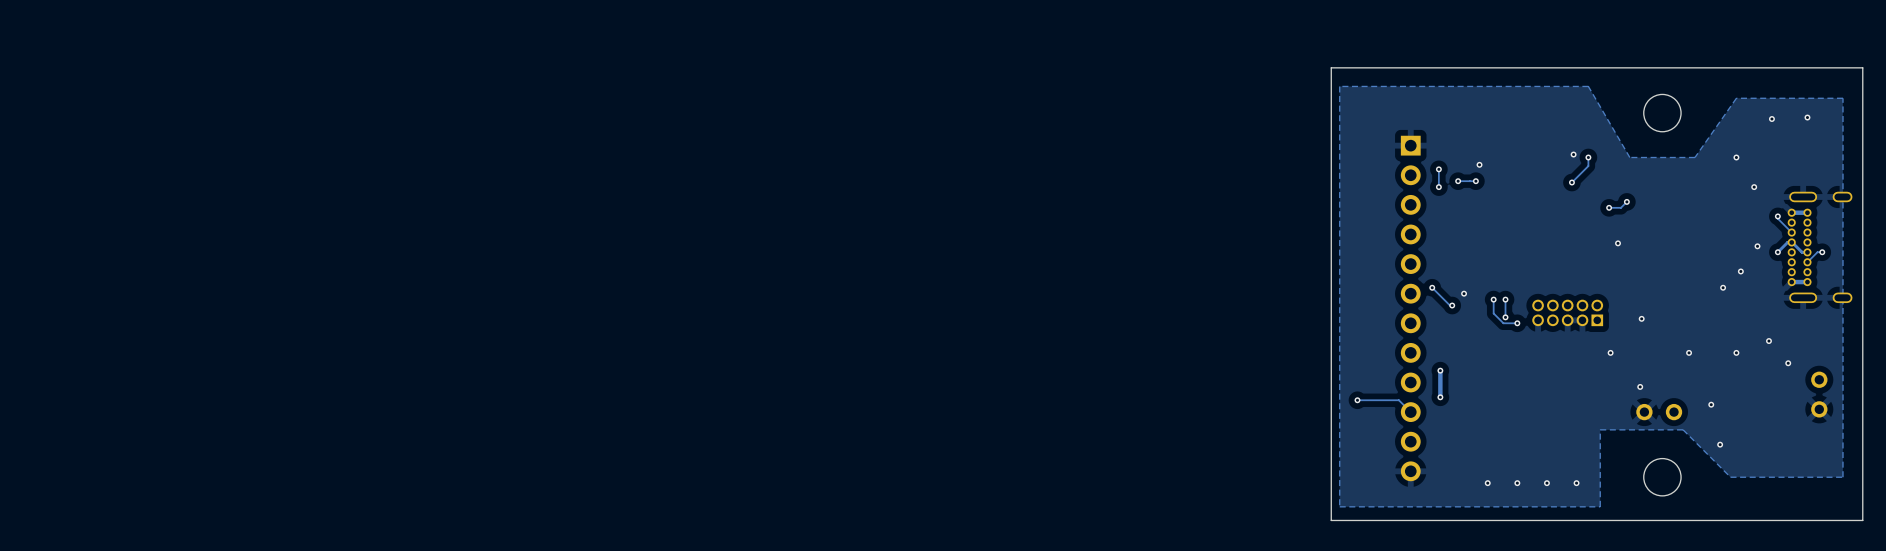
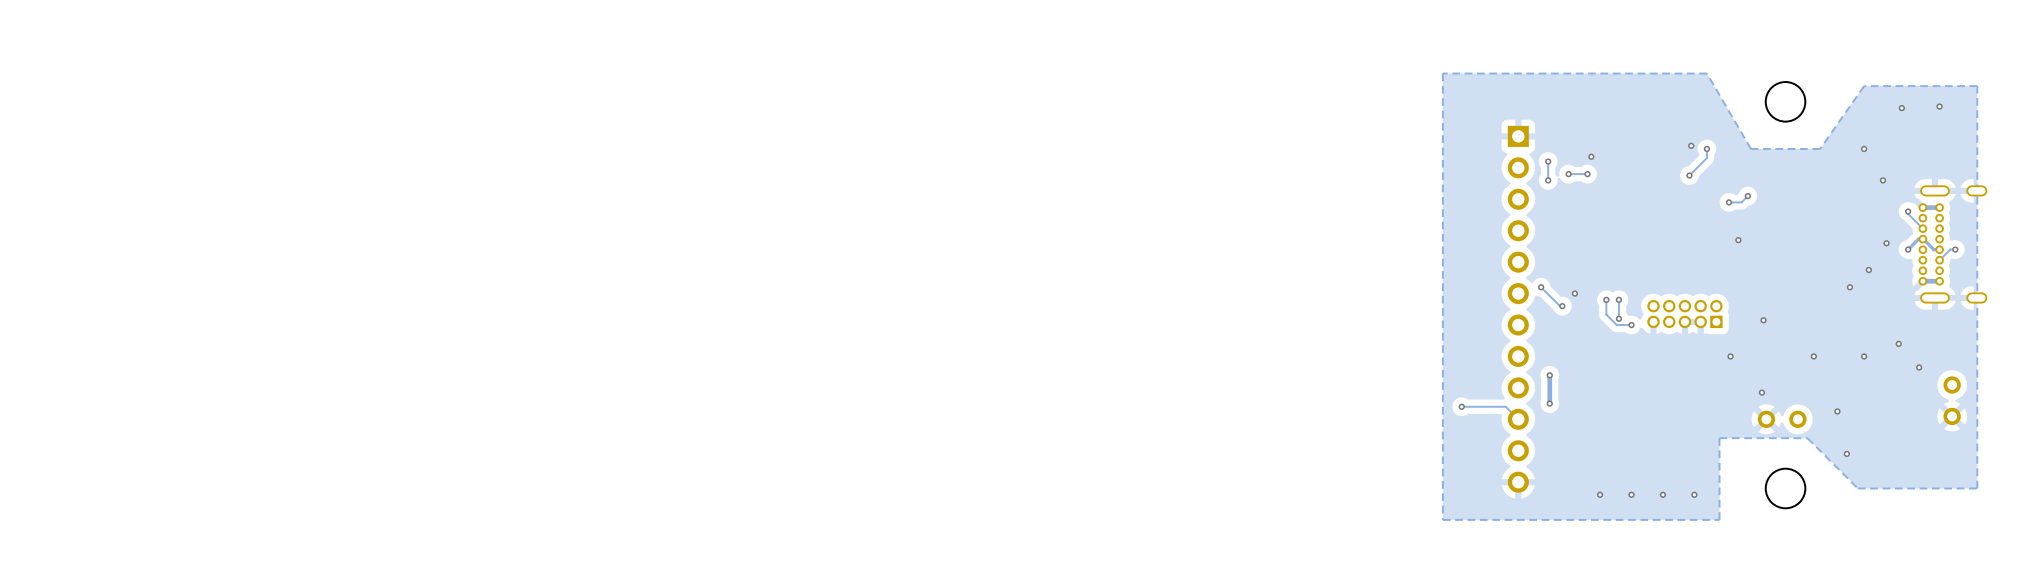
board edge: (1862, 67) (1331, 67) (1331, 520) (1862, 520) (1862, 67) -> none

